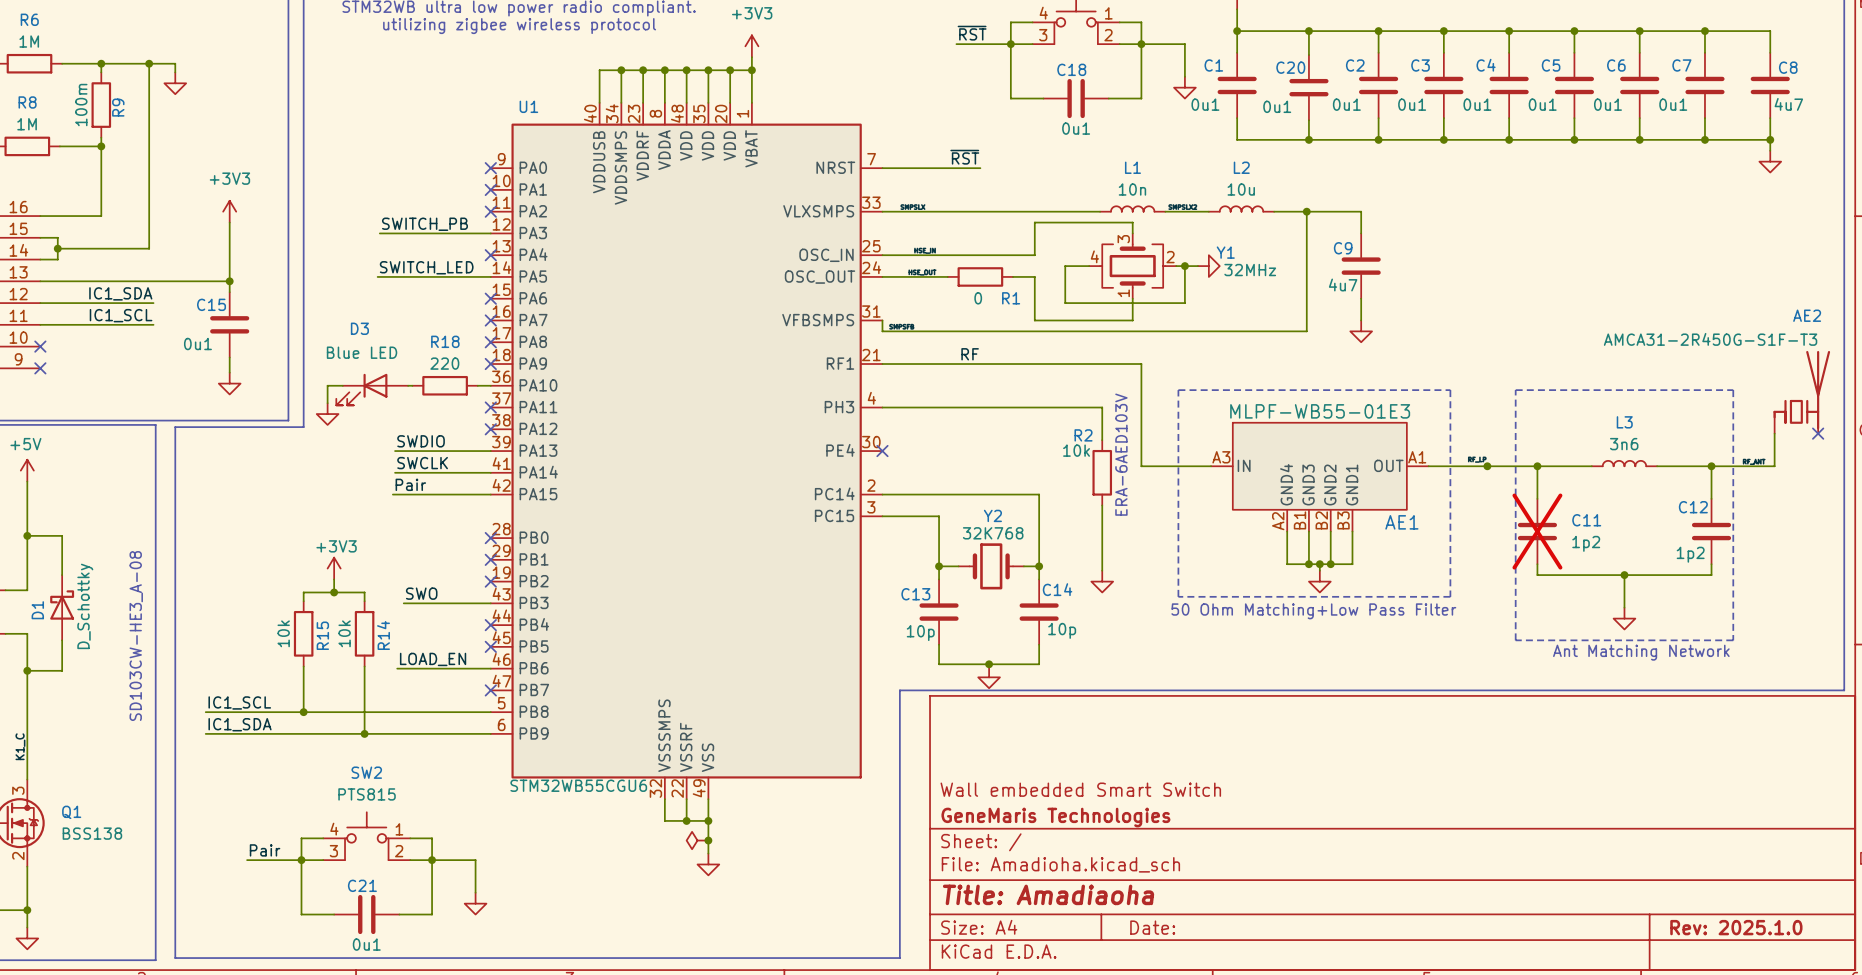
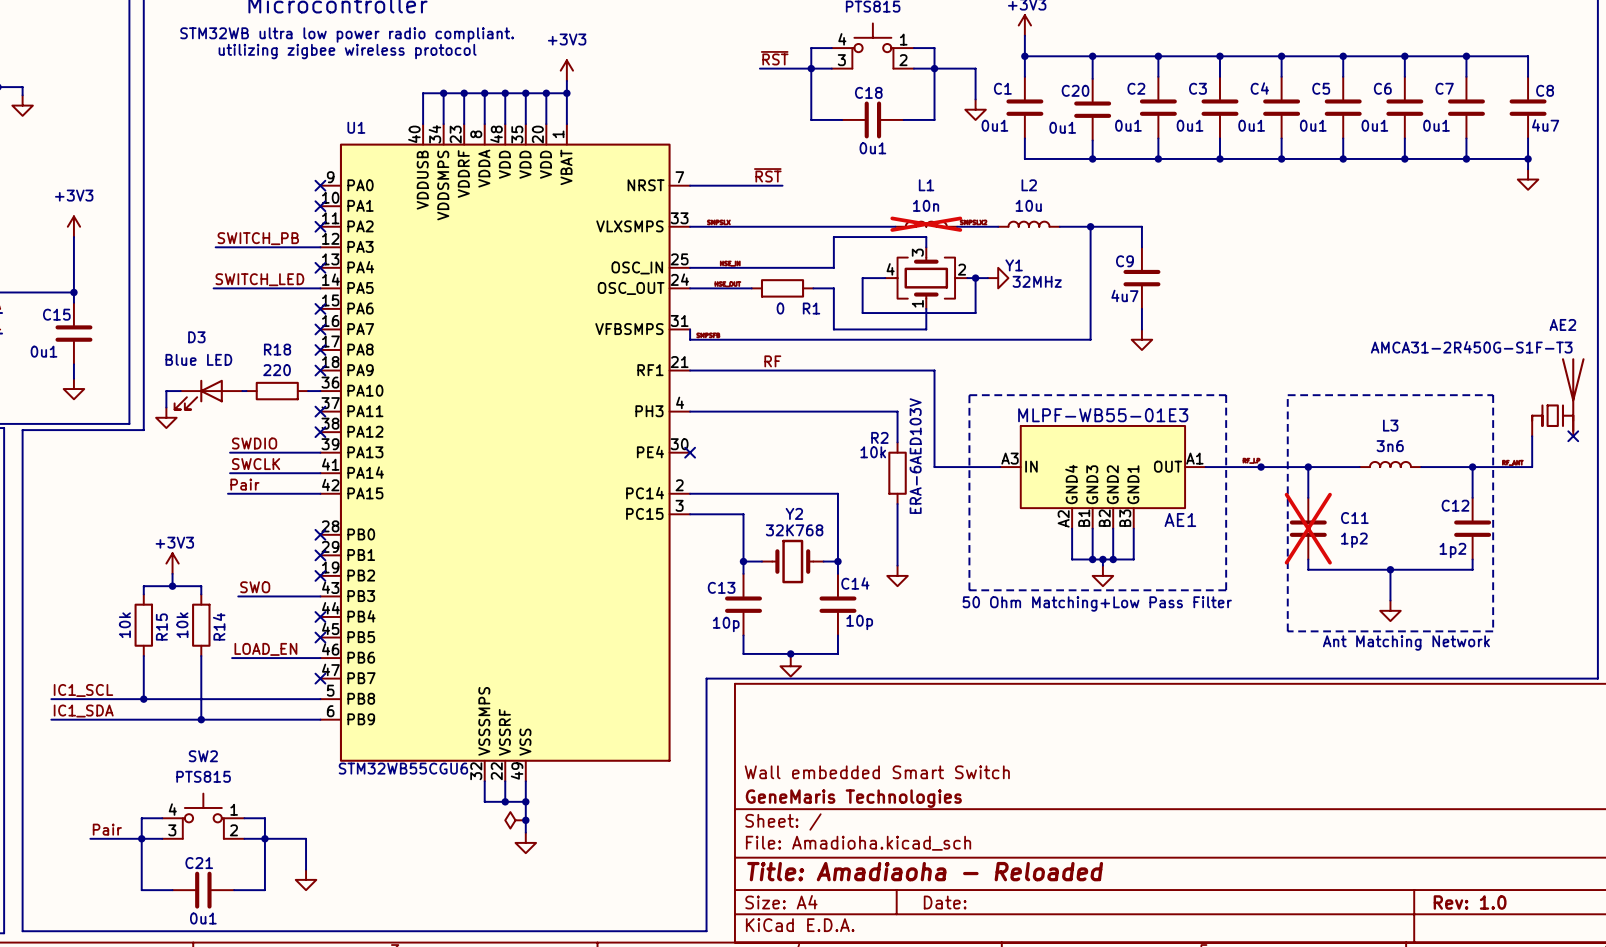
L1 do-not-place cross: none -> (926, 224)
title block: Title: Amadiaoha (1048, 894) -> Title: Amadiaoha - Reloaded (925, 871)
title block: Rev: 2025.1.0 (1736, 927) -> Rev: 1.0 (1470, 902)

